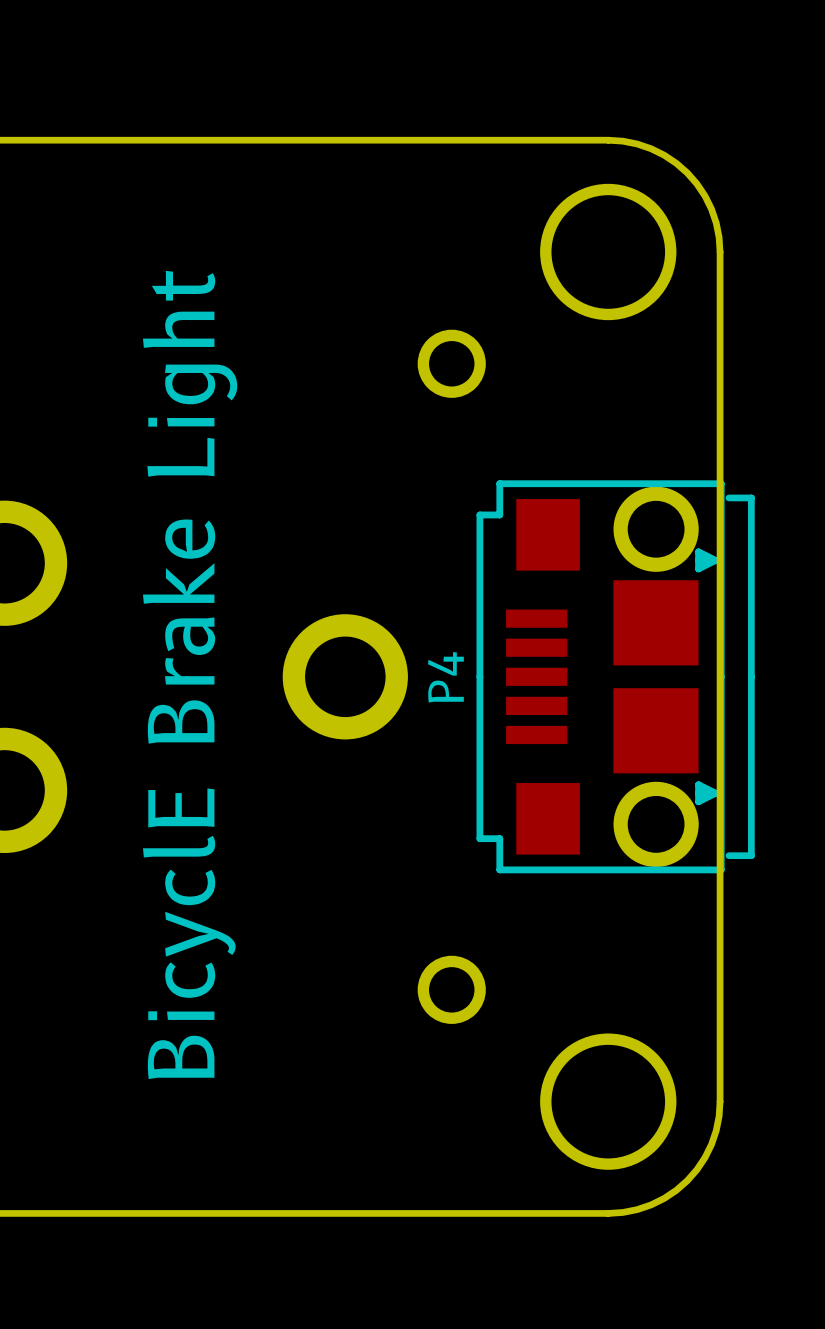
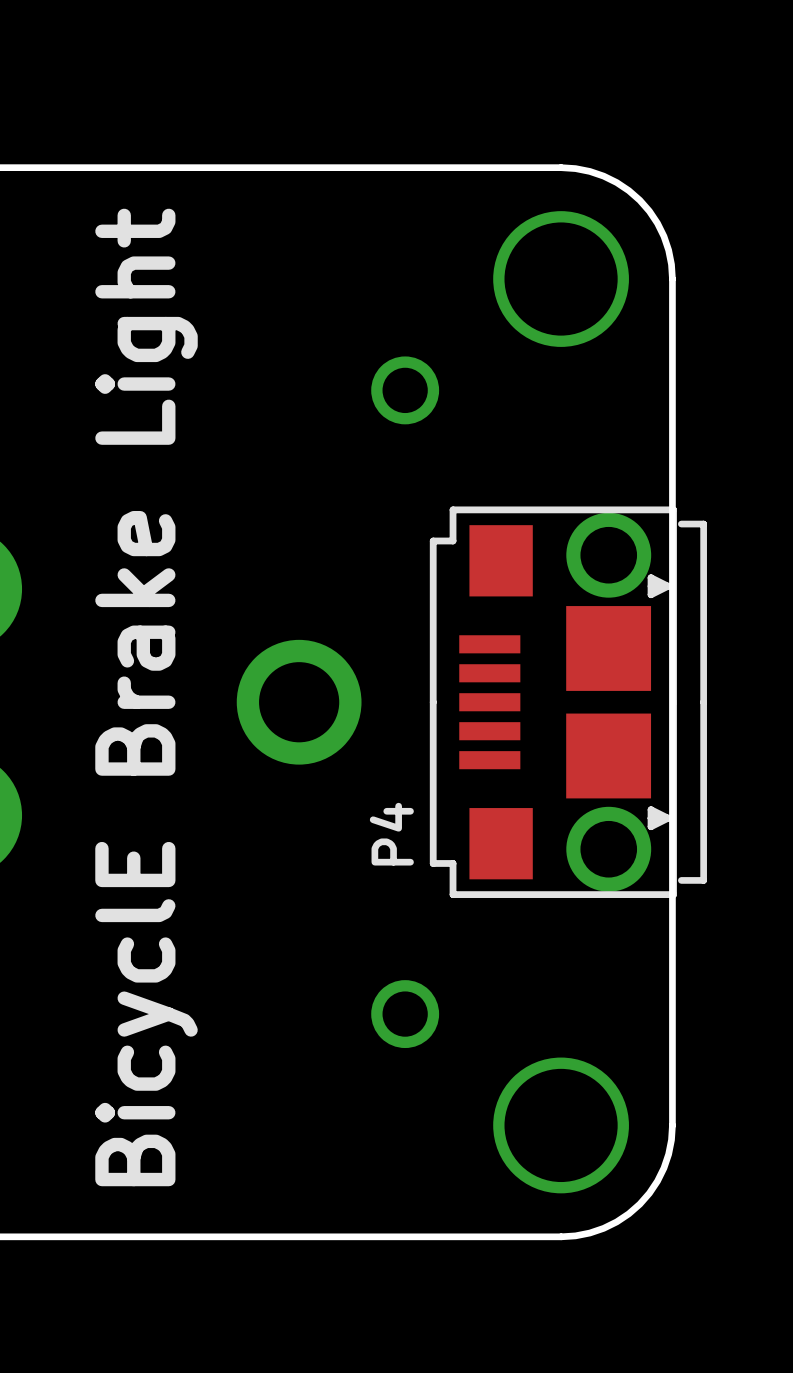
P4 name position: P4 (445, 677) -> P4 (391, 834)

